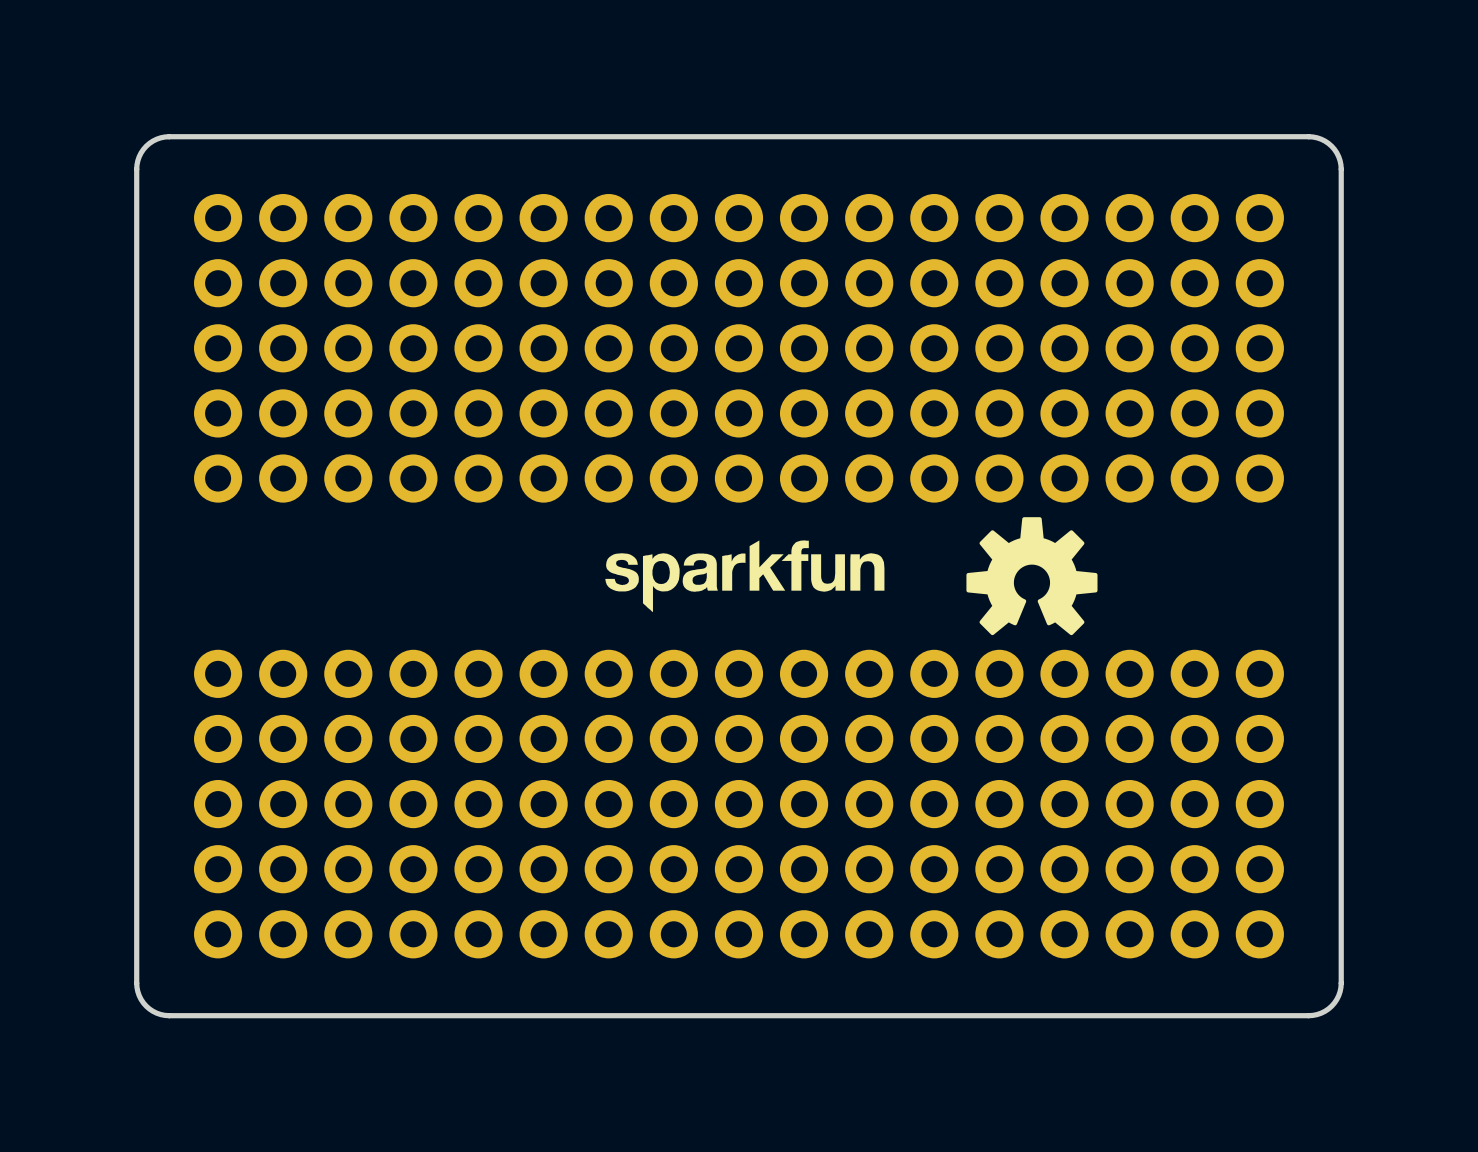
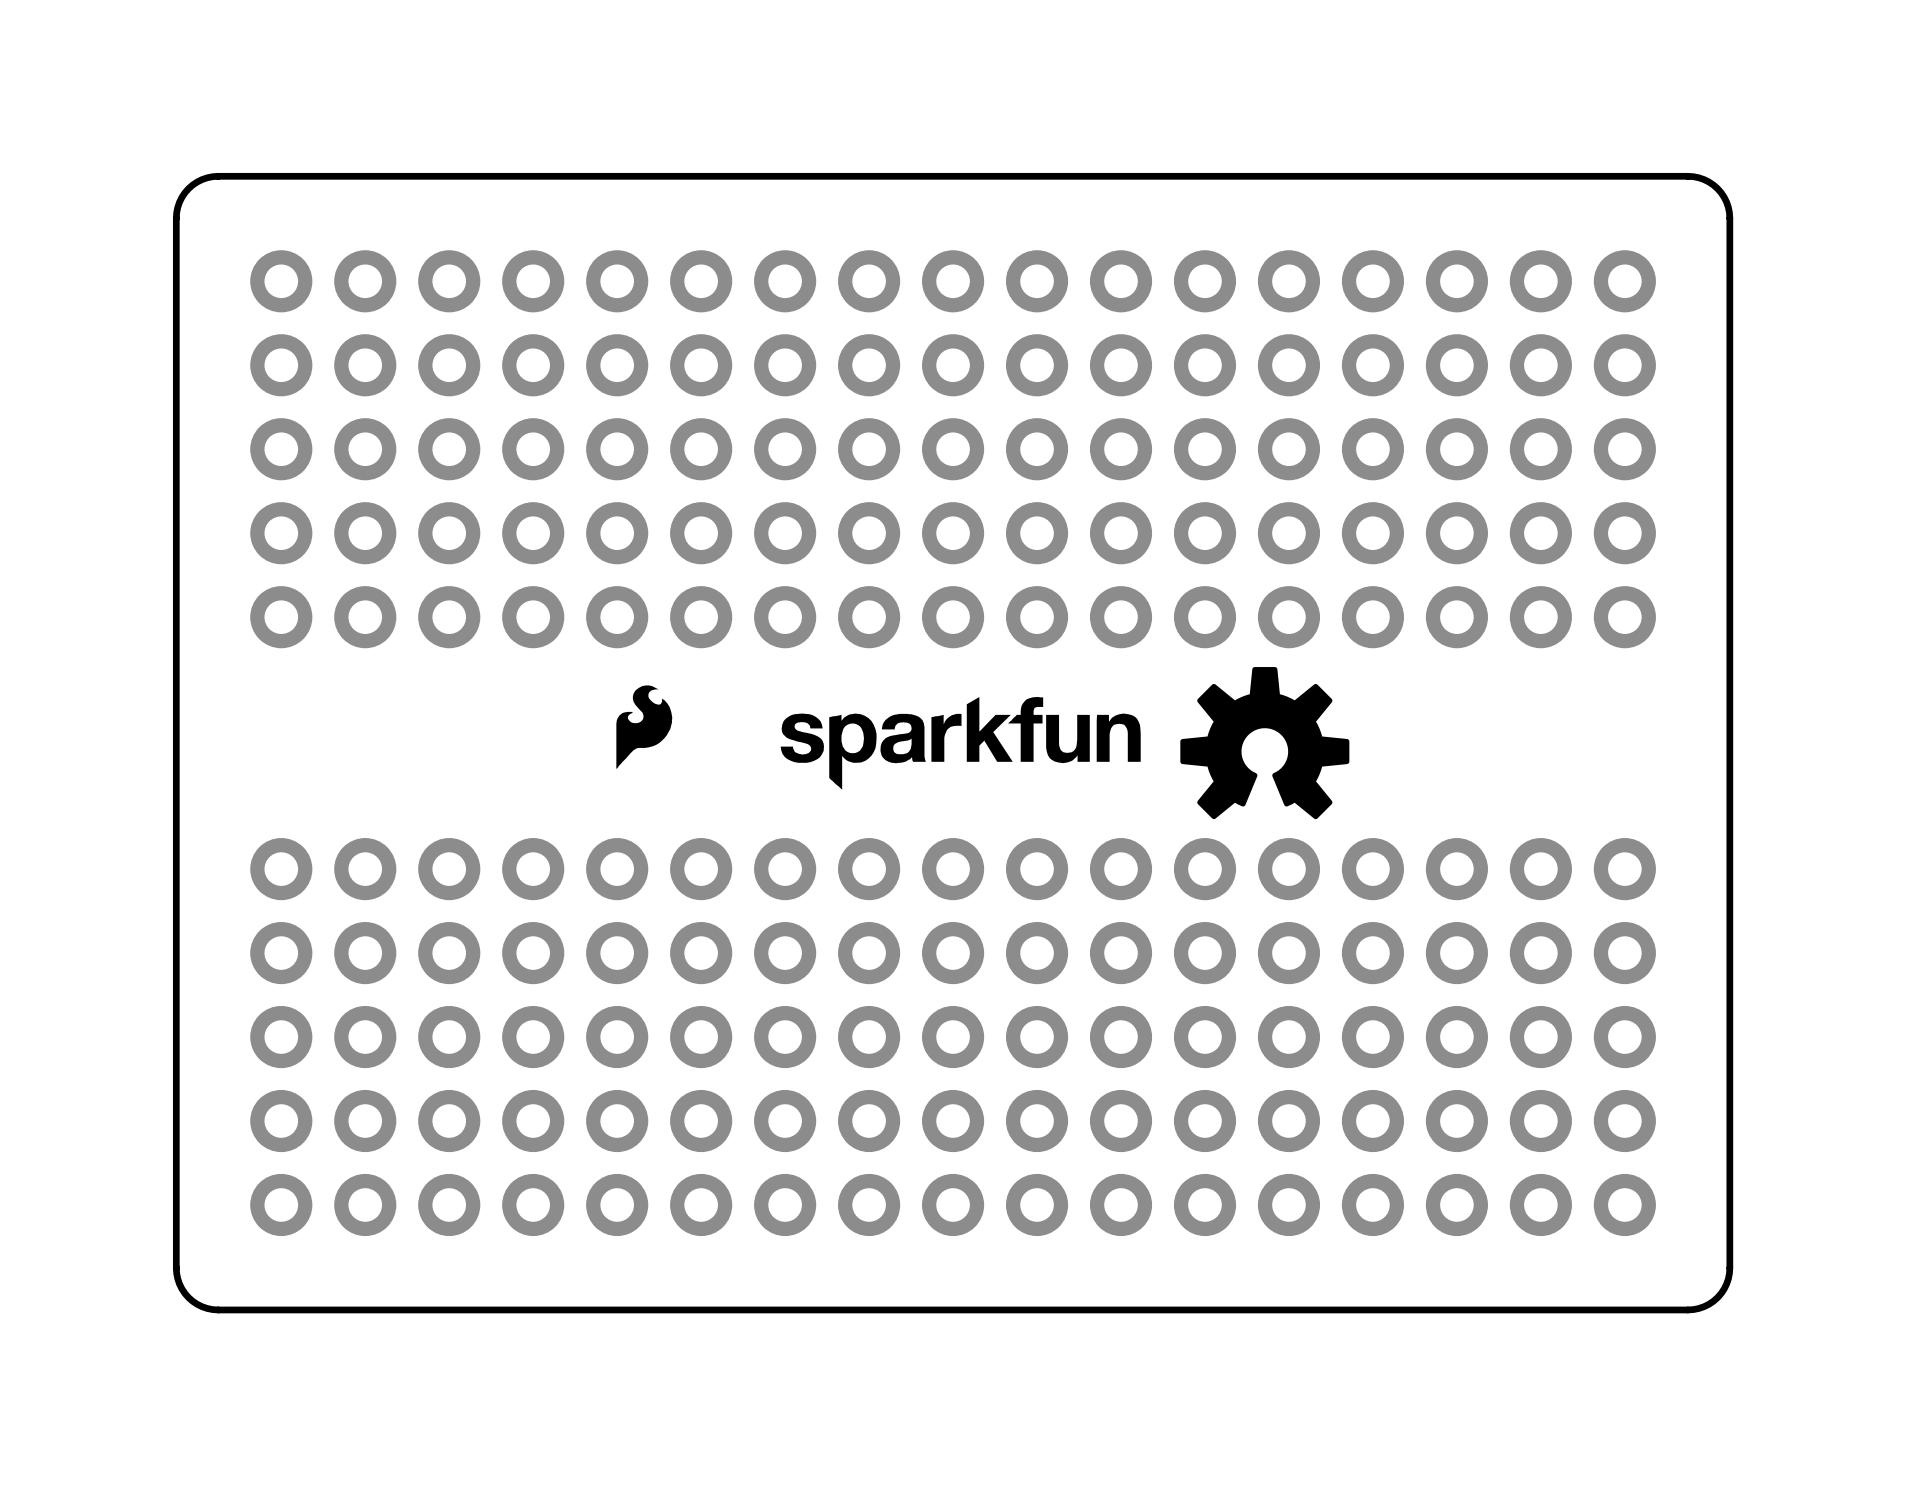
drawing: none -> [616, 685, 673, 770]
drawing position: (1031, 576) -> (1264, 743)

